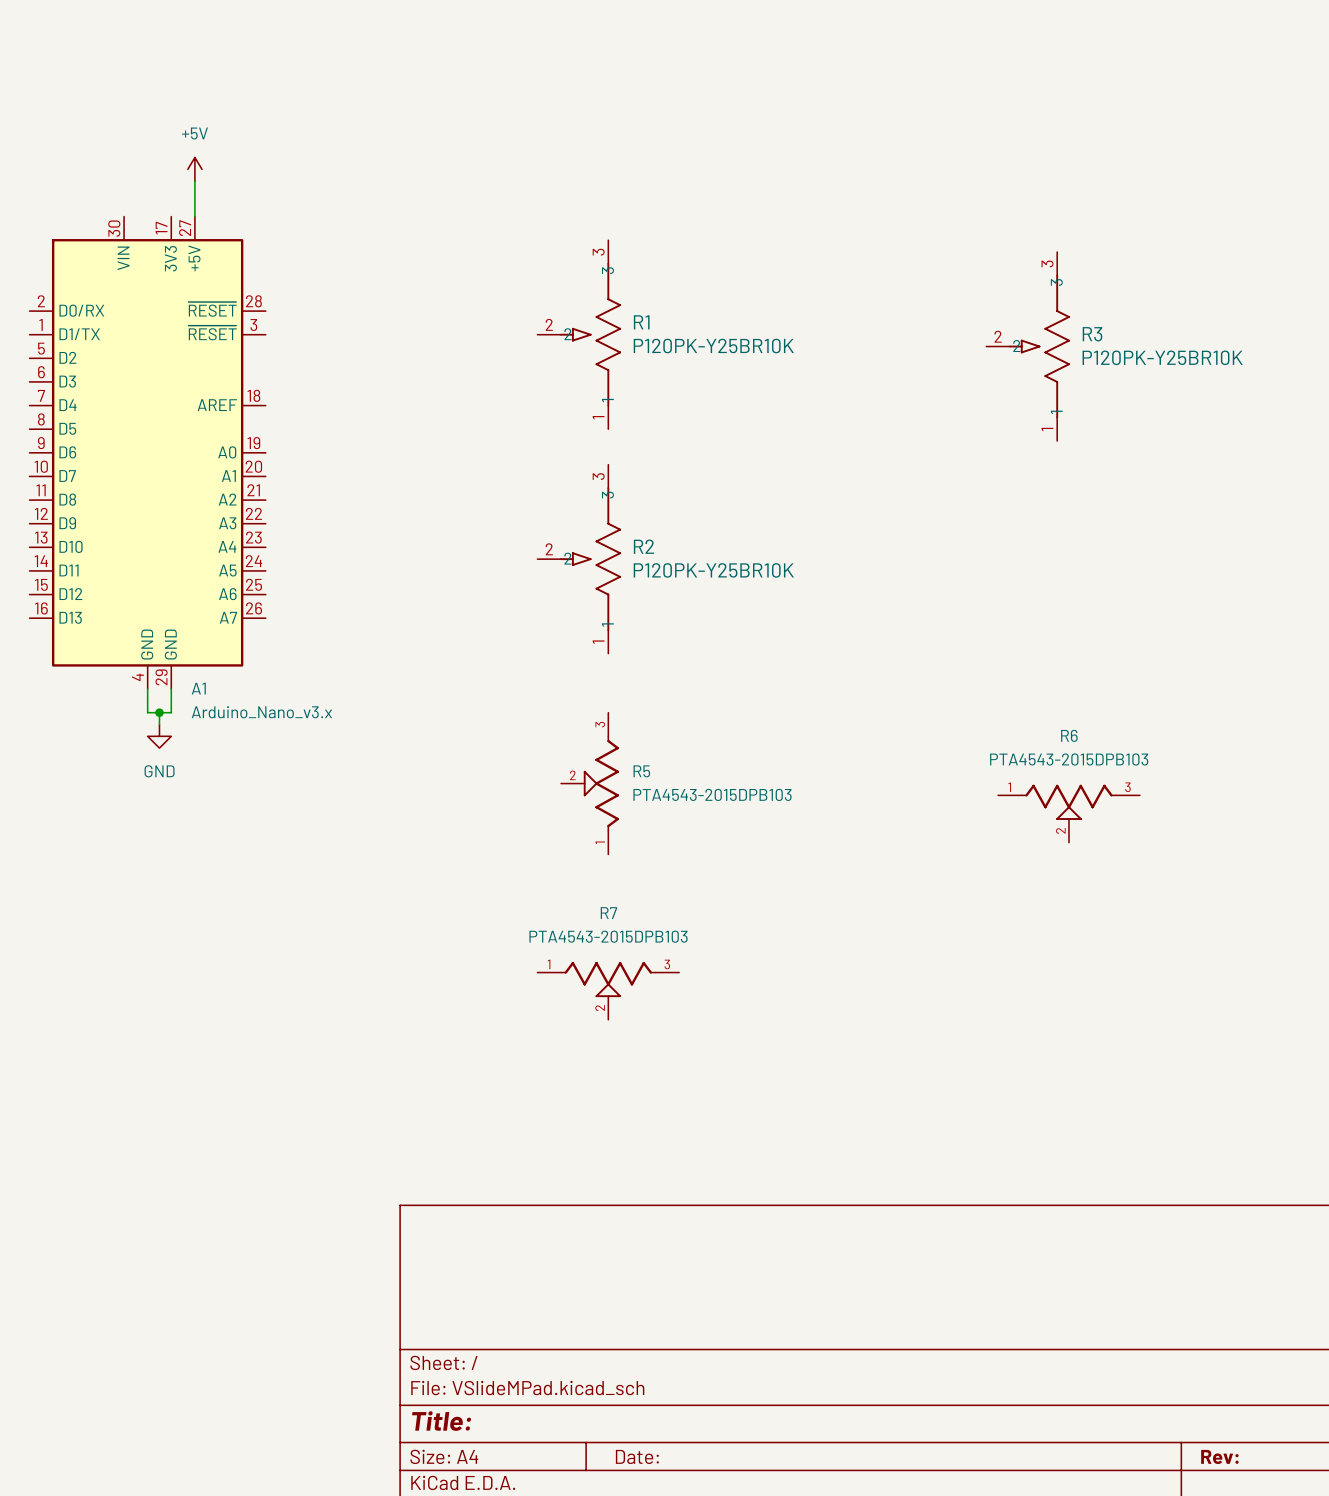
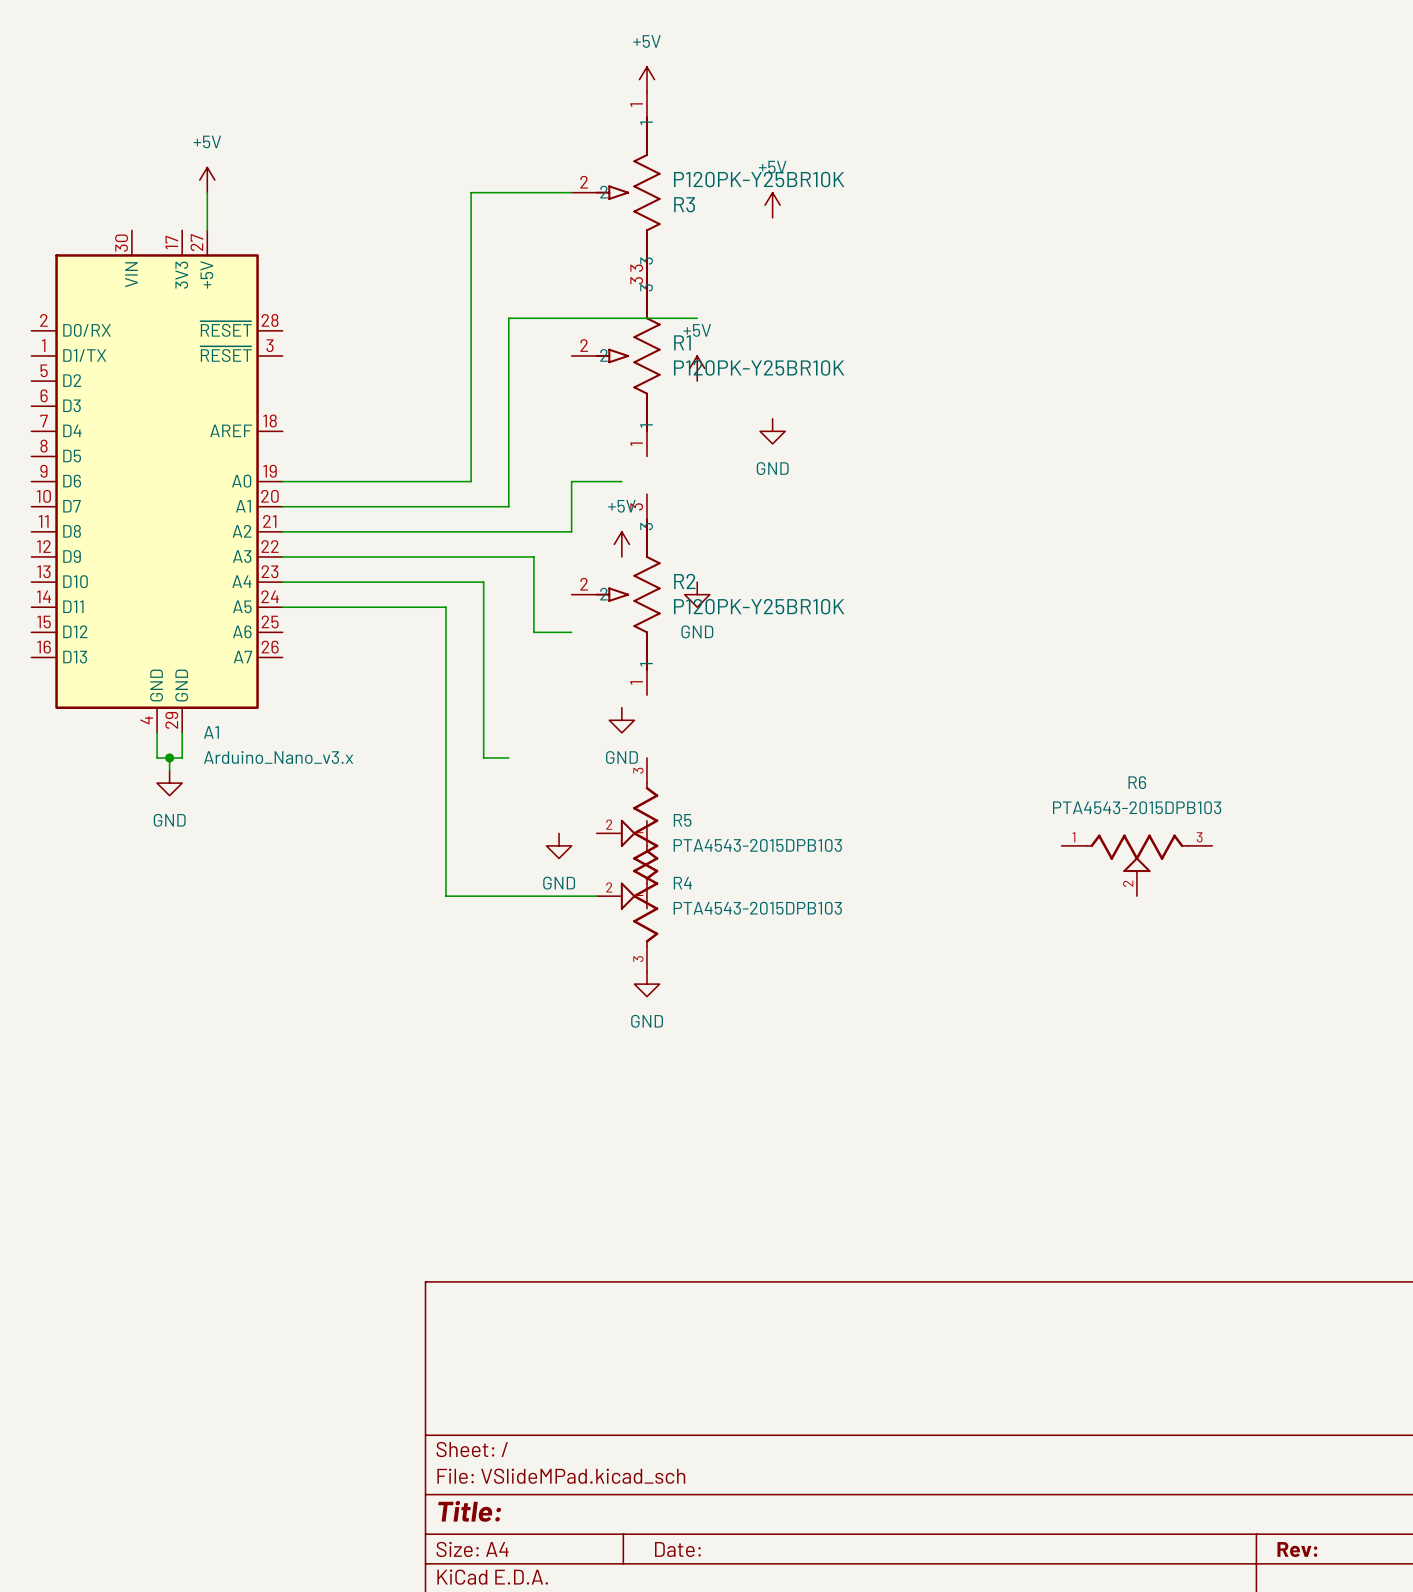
power symbol: none -> +5V (646, 79)
wire: none -> (571, 192) (471, 192) (471, 481) (282, 481)
power symbol: none -> +5V (772, 205)
wire: none -> (697, 318) (508, 318) (508, 506) (282, 506)
power symbol: none -> +5V (697, 368)
R3 position: (1028, 346) -> (616, 192)
R3 flip: as is (1039, 346) -> up-down (628, 192)
power symbol: none -> GND (772, 431)
wire: none -> (621, 481) (571, 481) (571, 531) (282, 531)
power symbol: none -> +5V (621, 544)
wire: none -> (282, 556) (533, 556) (533, 632) (571, 632)
wire: none -> (282, 582) (483, 582) (483, 757) (508, 757)
power symbol: none -> GND (697, 594)
wire: none -> (282, 607) (445, 607) (445, 896) (596, 896)
power symbol: none -> GND (621, 720)
power symbol: none -> GND (559, 845)
R4: none -> PTA4543-2015DPB103 (627, 896)
power symbol: none -> GND (646, 984)
R7: PTA4543-2015DPB103 (608, 990) -> none

